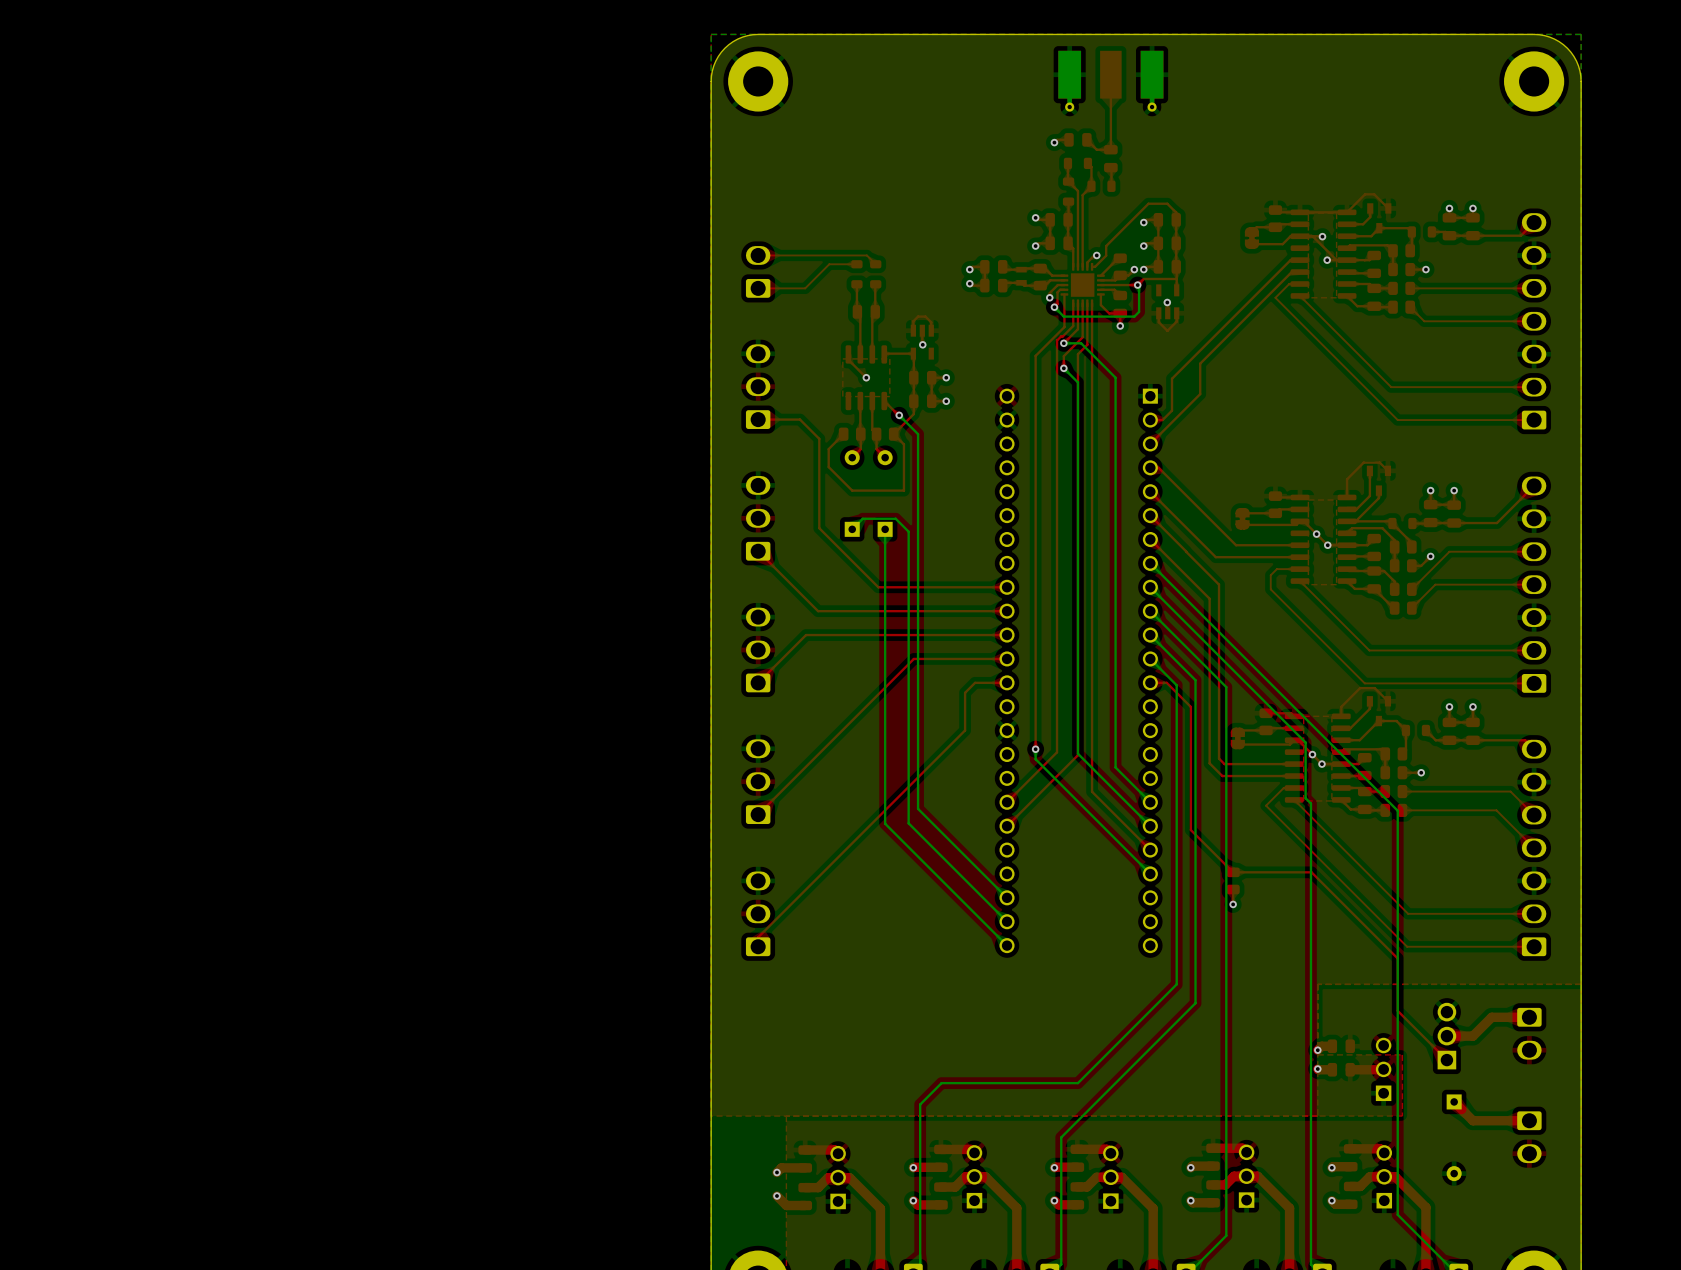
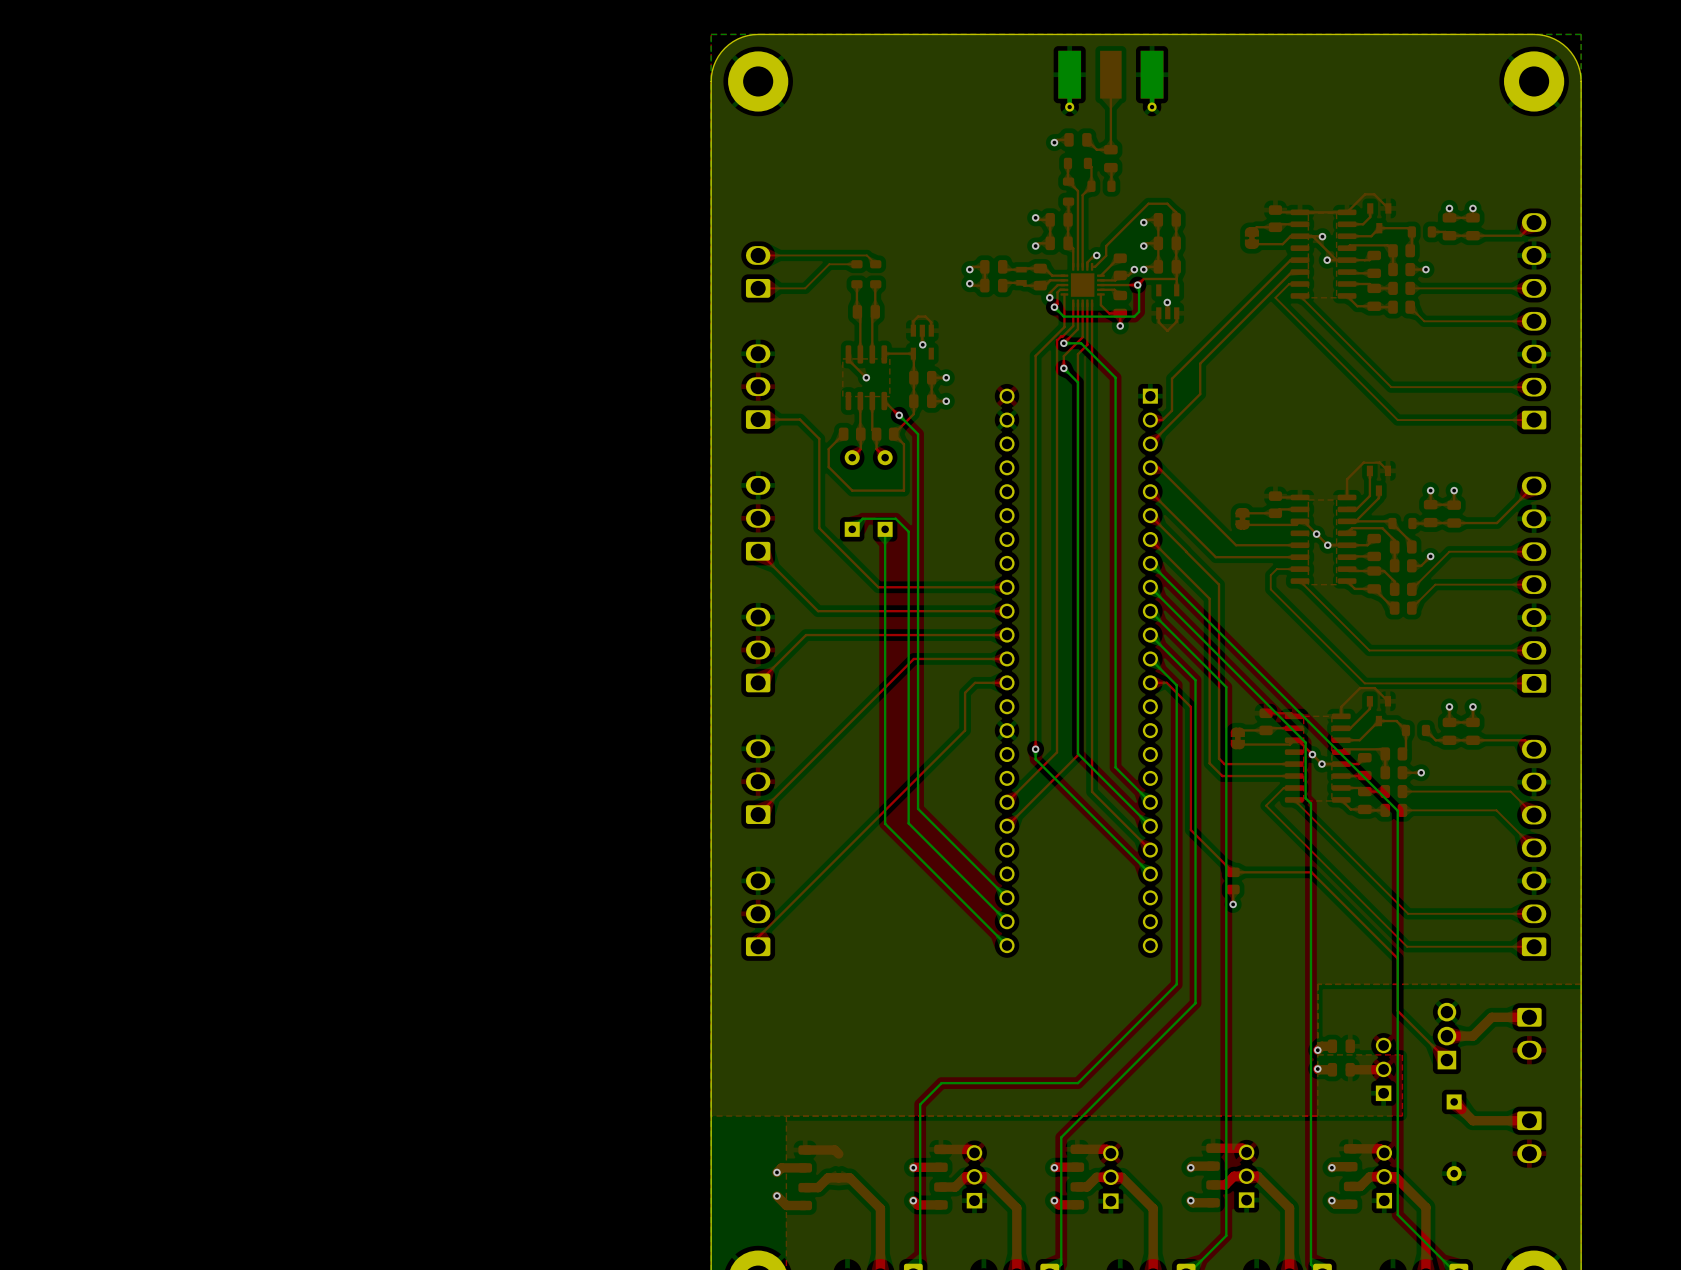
part: (838, 1177) -> none

